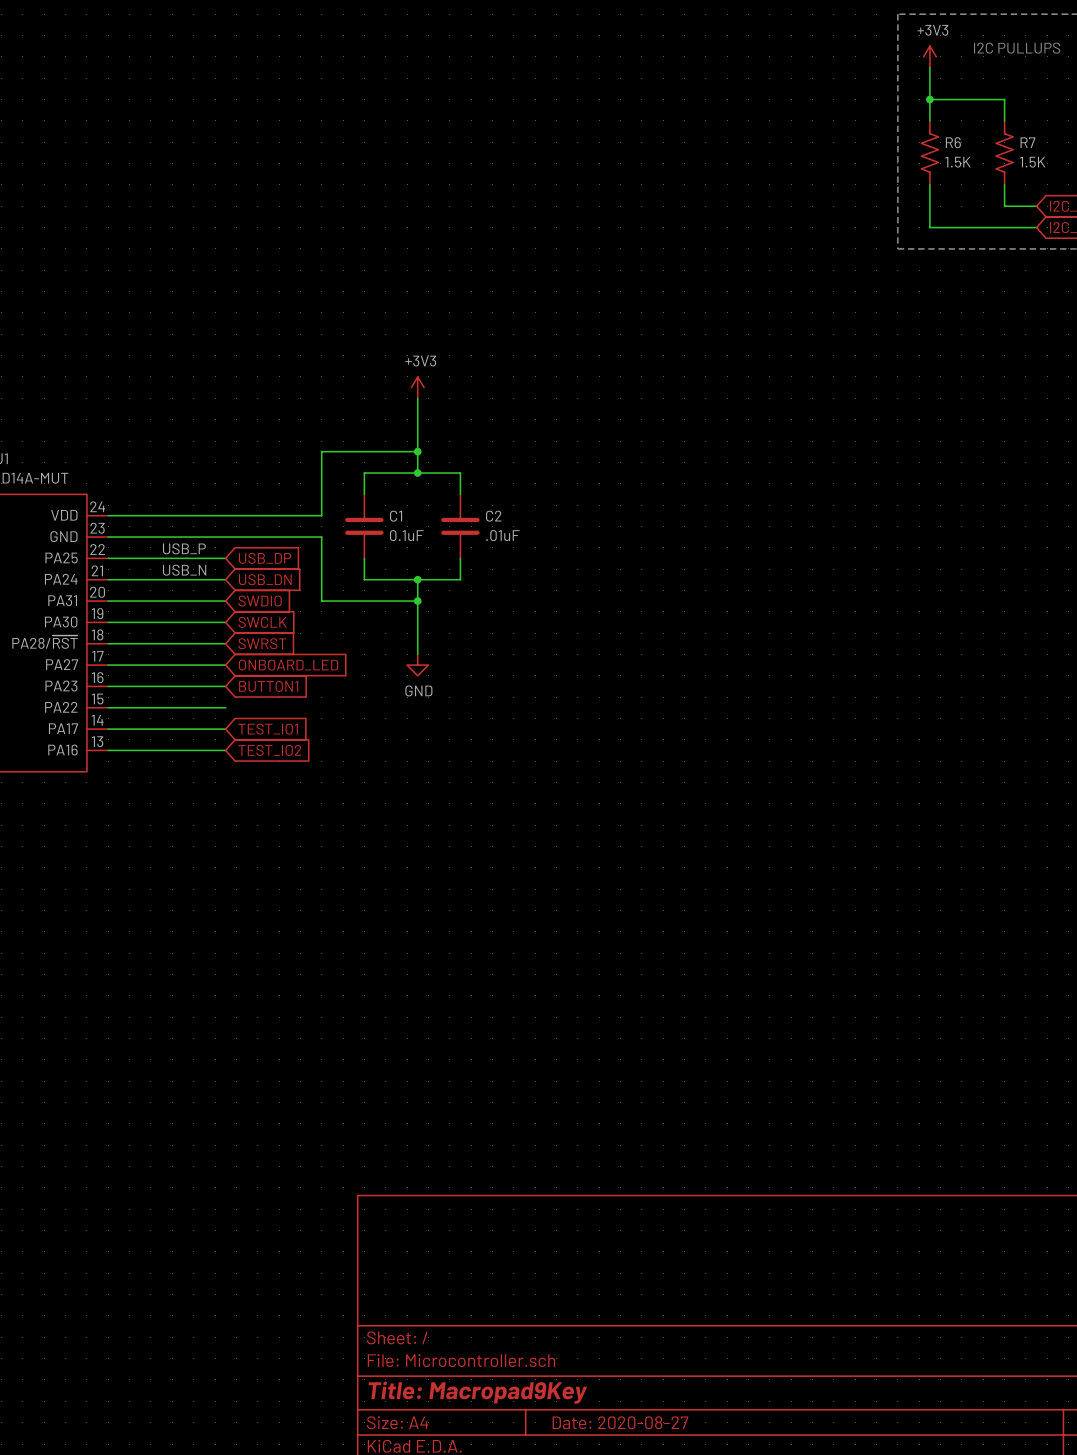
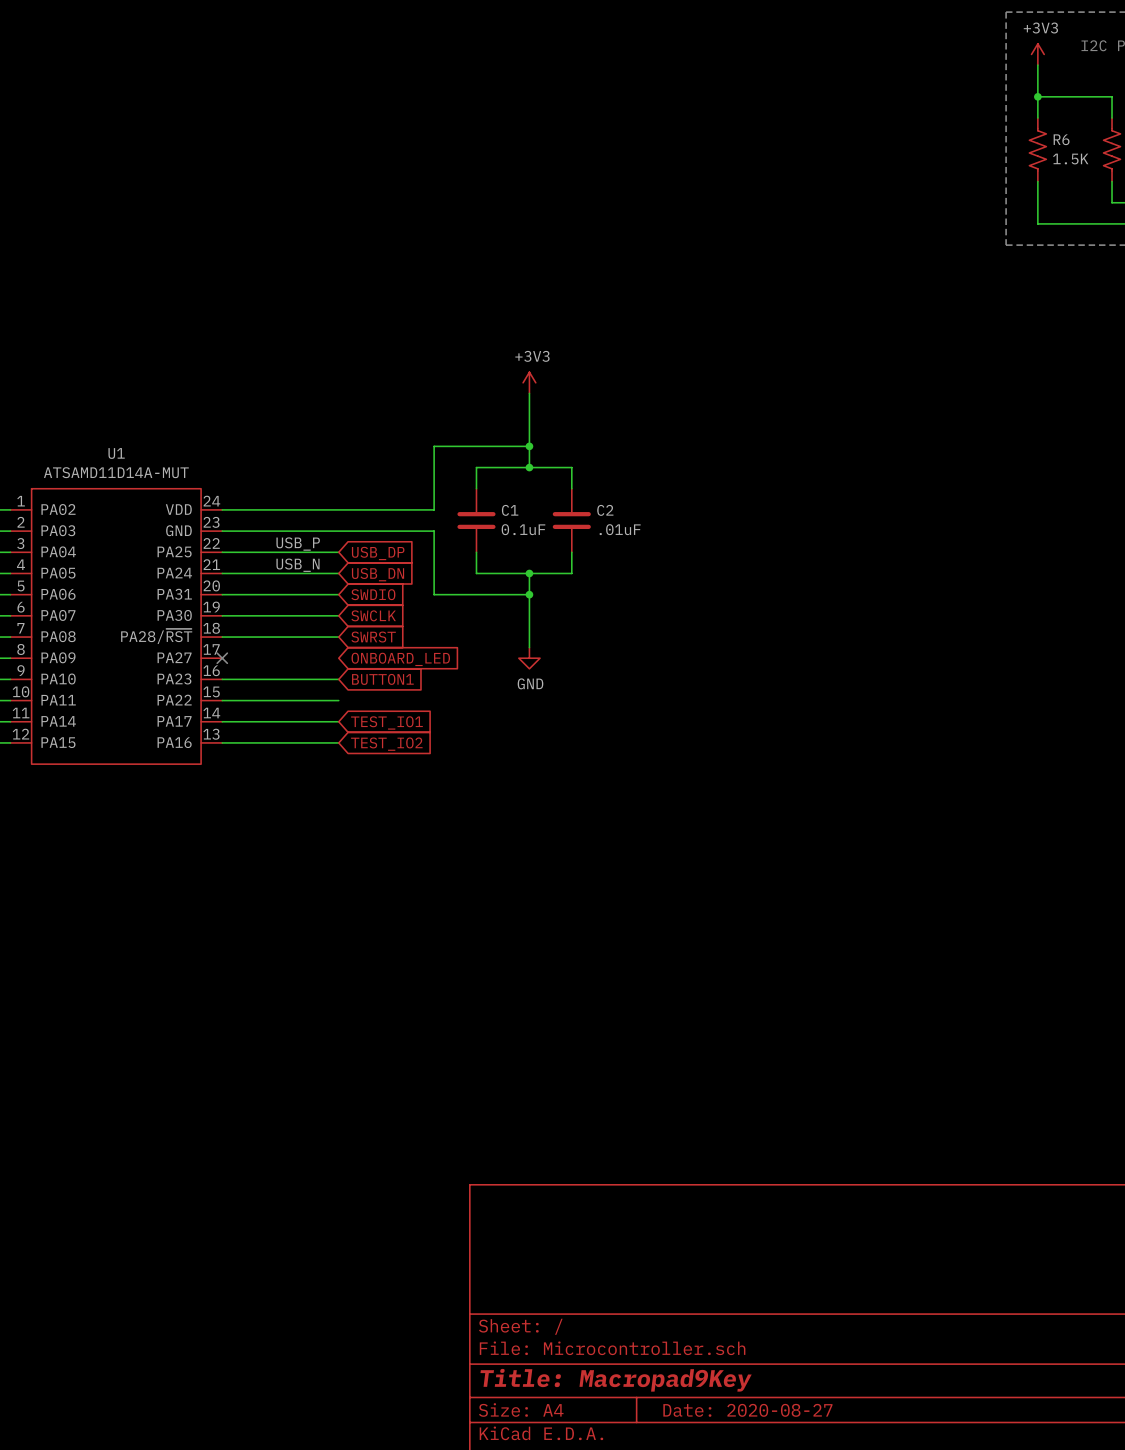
wire: (108, 665) (225, 665) -> none
no-connect mark: none -> (222, 658)

